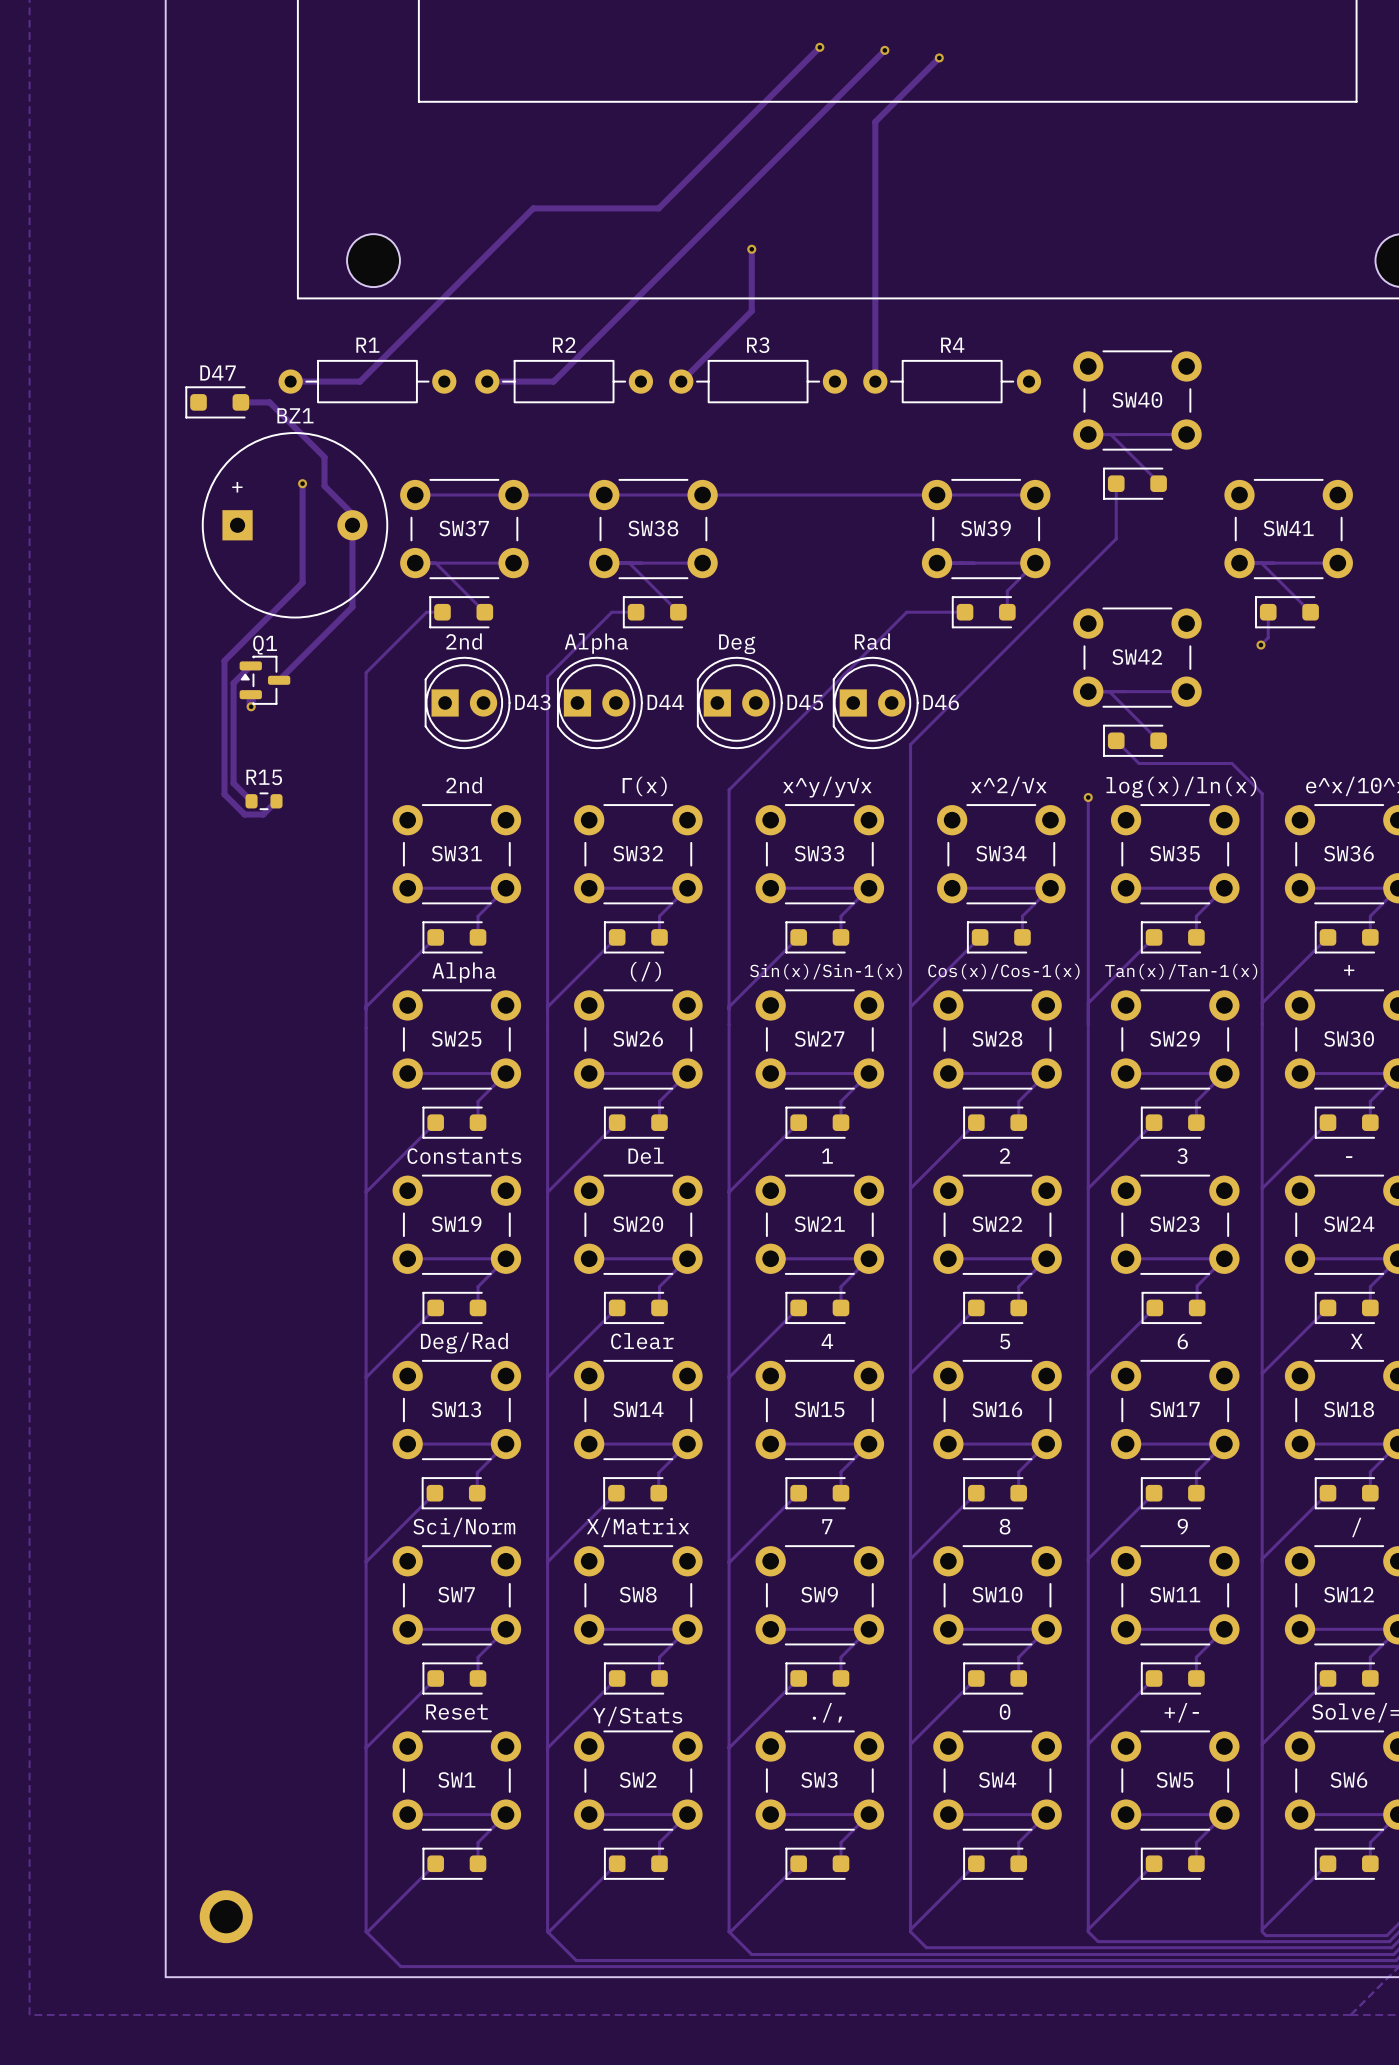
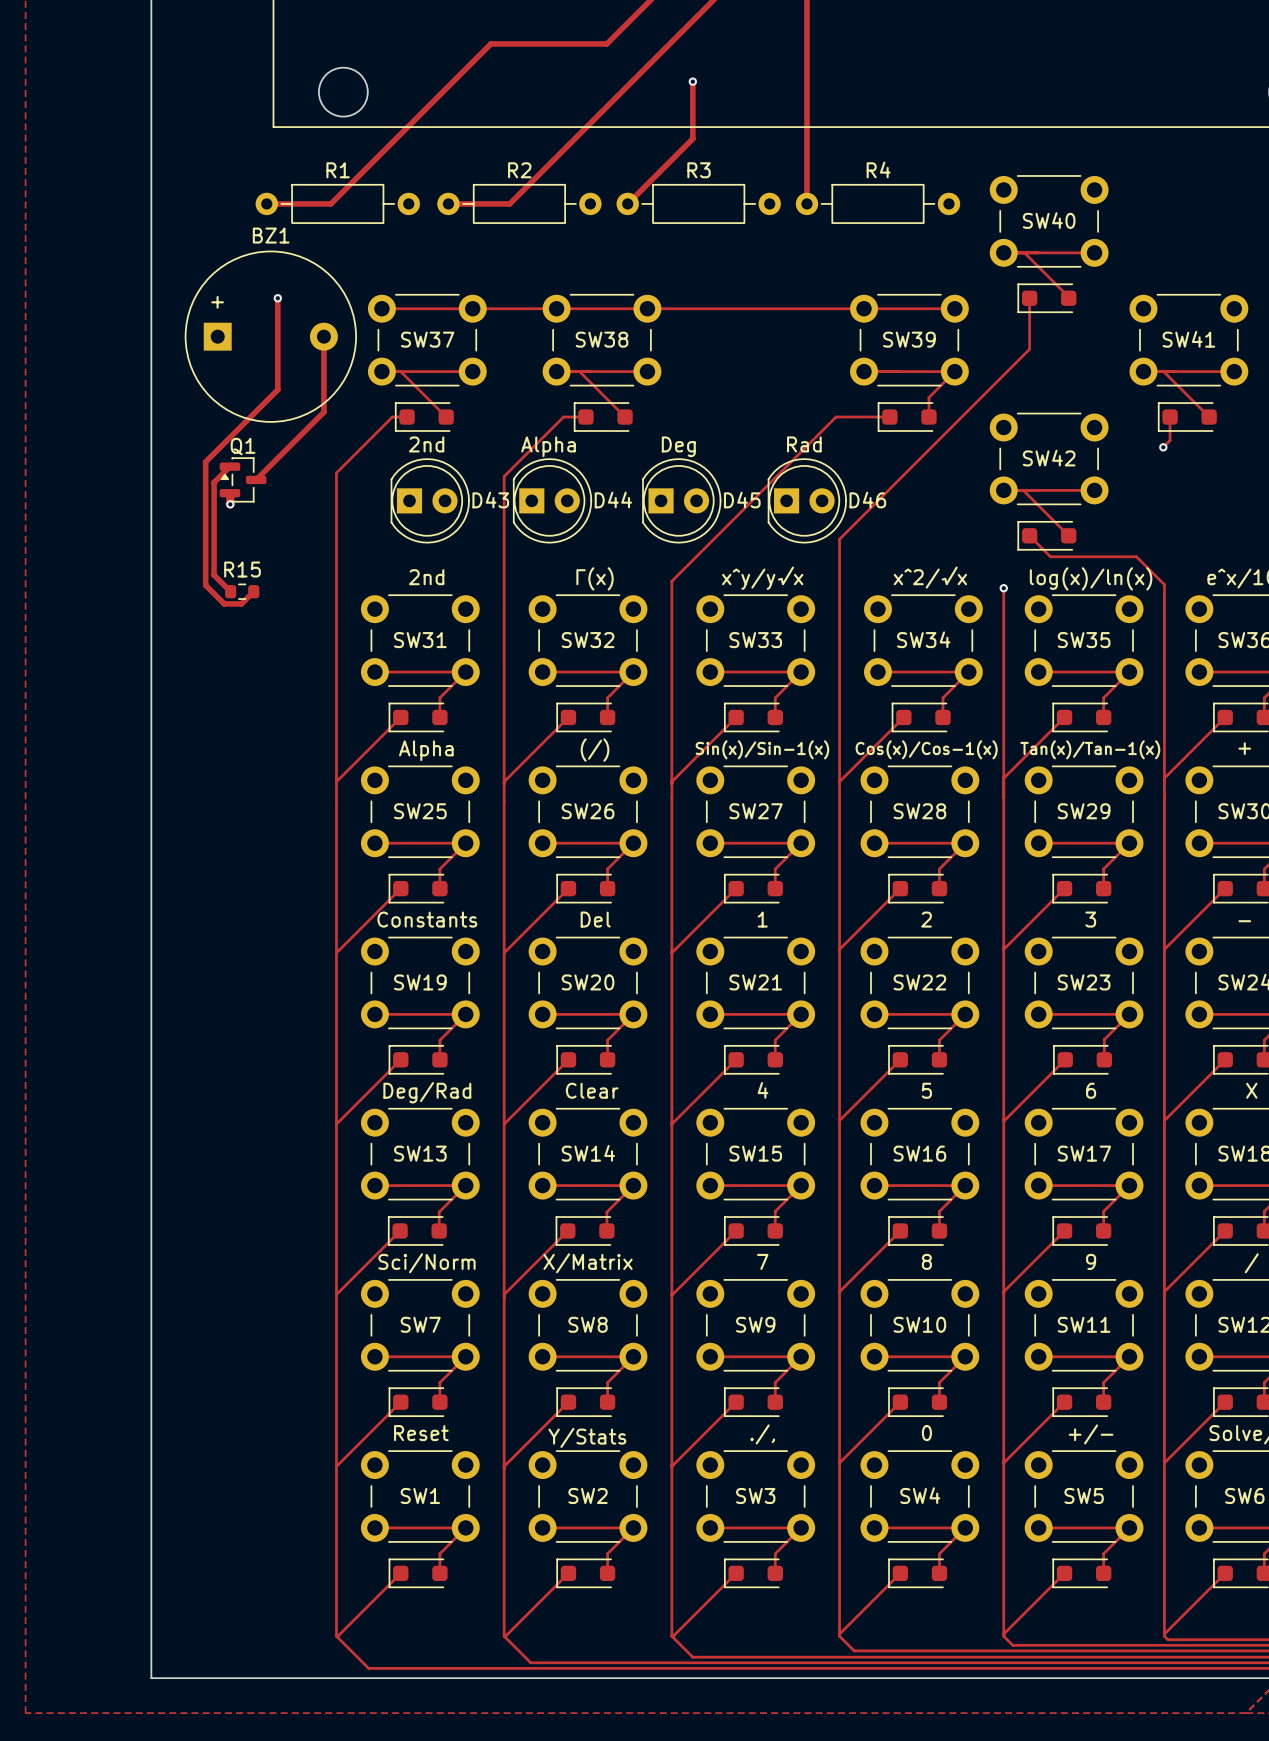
D47: (217, 402) -> none
track: (240, 402) (269, 402) (324, 457) (324, 486) (352, 514) (352, 525) -> none
part: (226, 1916) -> none

